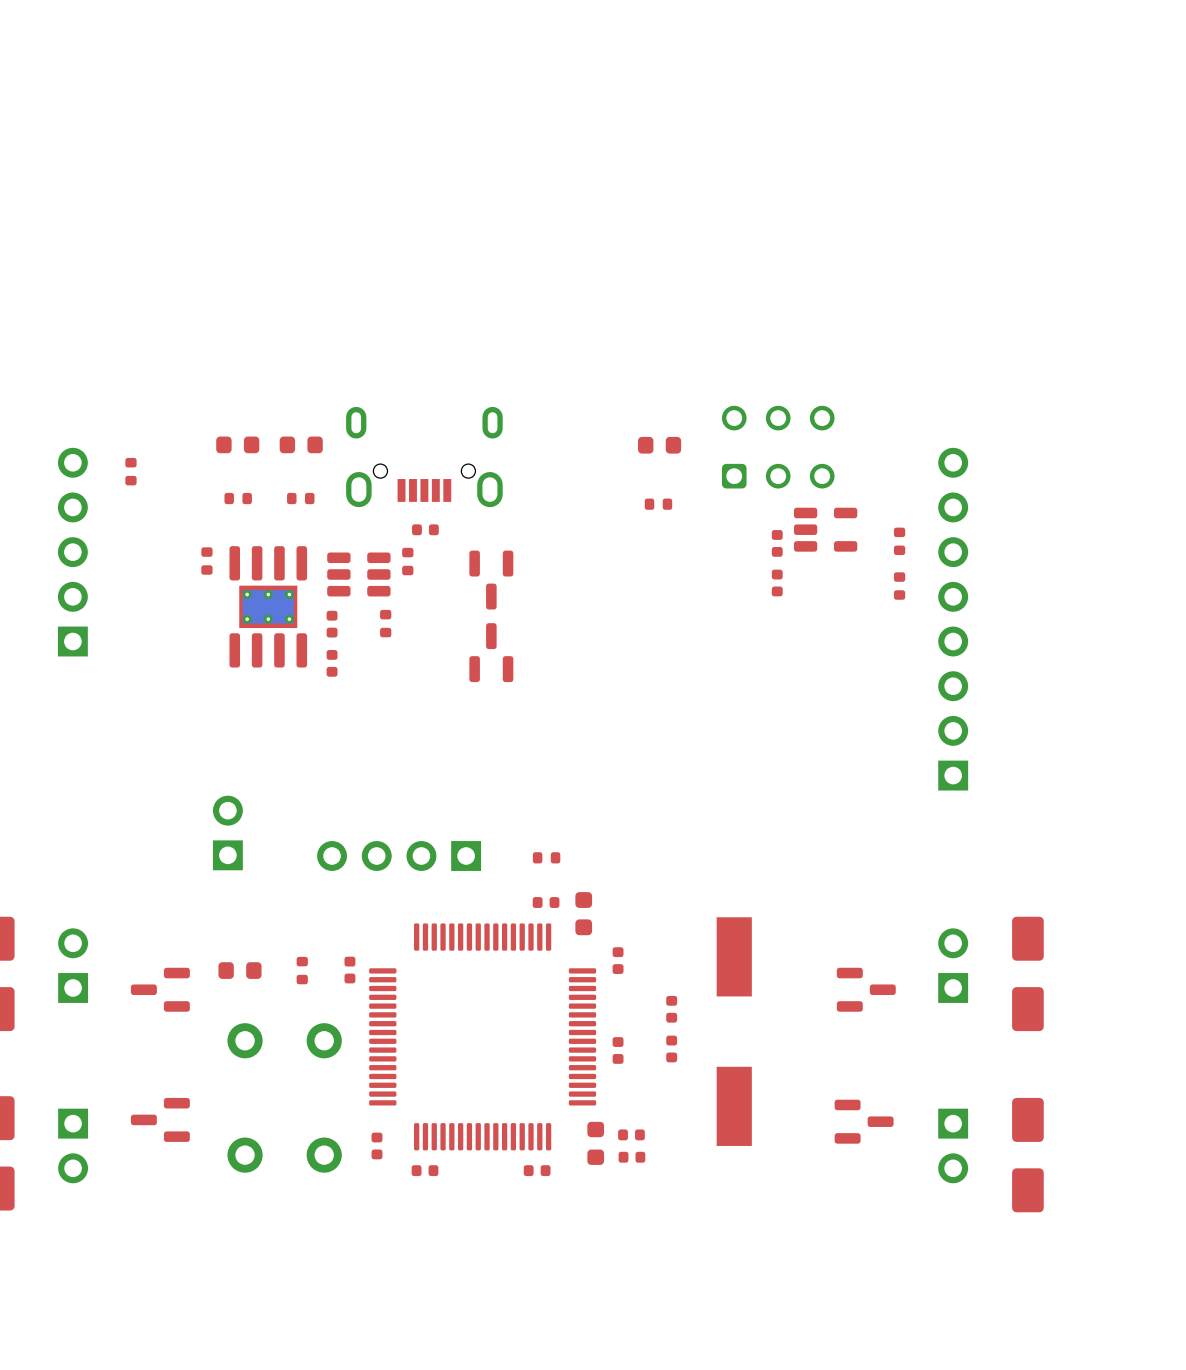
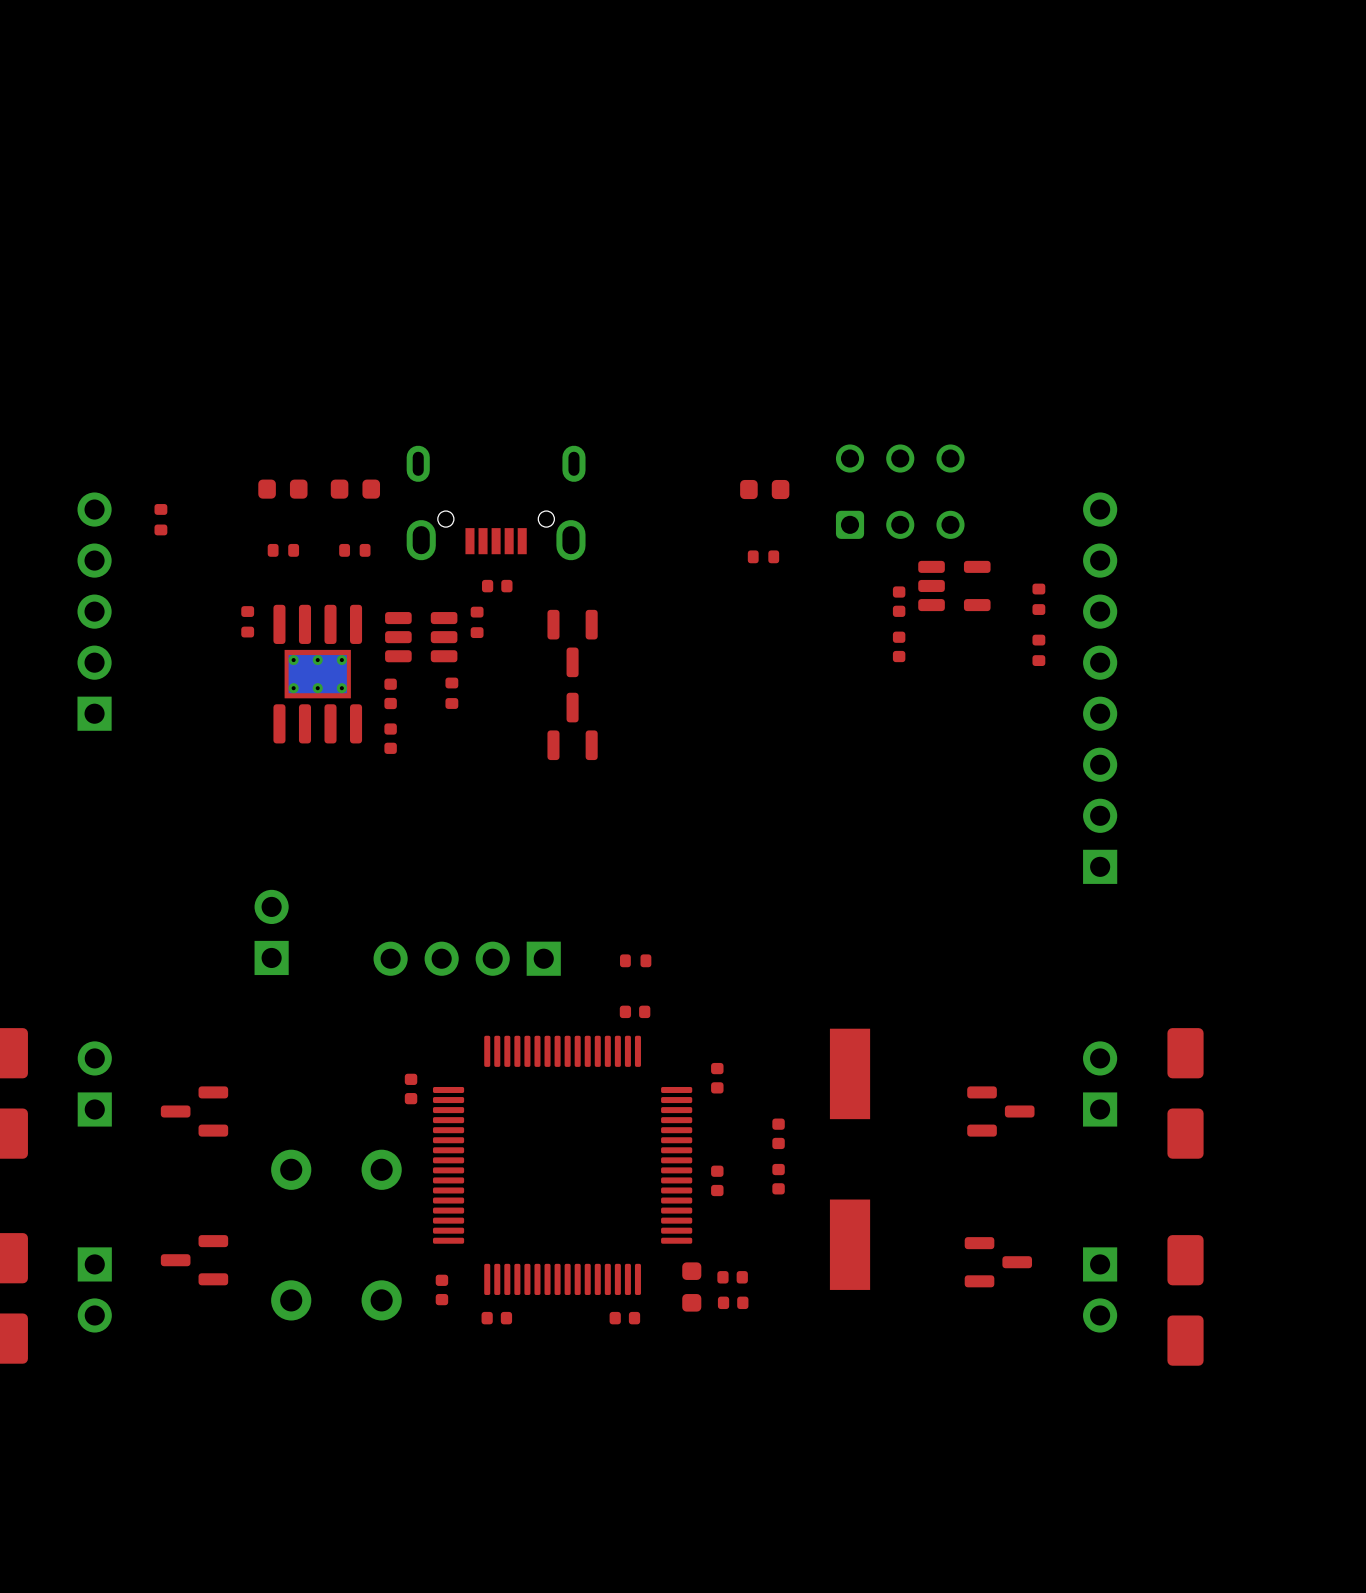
part: (583, 913) -> none
part: (239, 970) -> none
part: (302, 970) -> none

